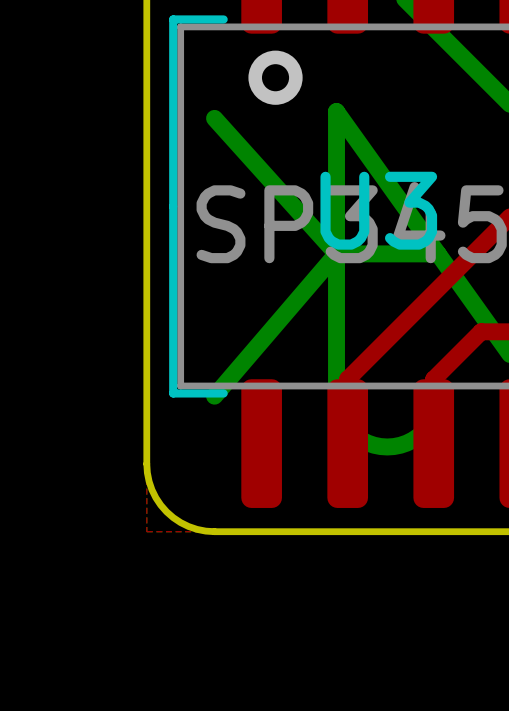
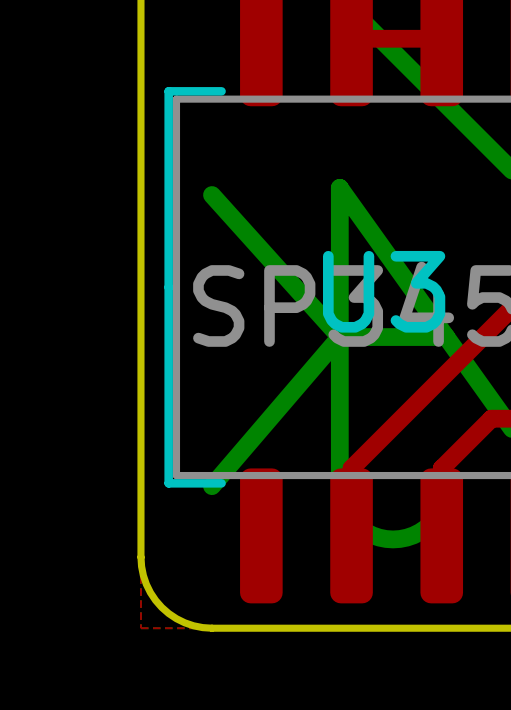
via: (275, 77) -> none

